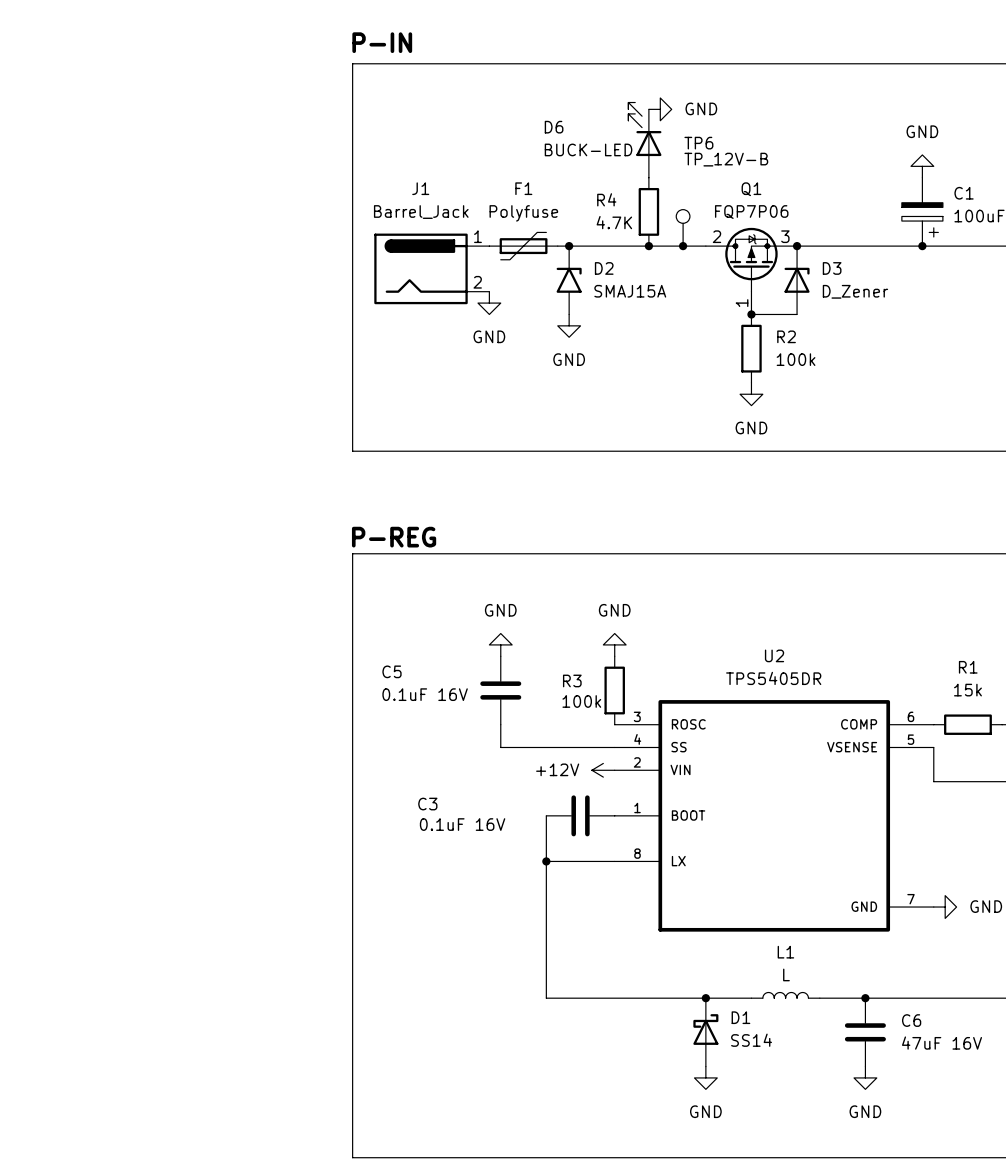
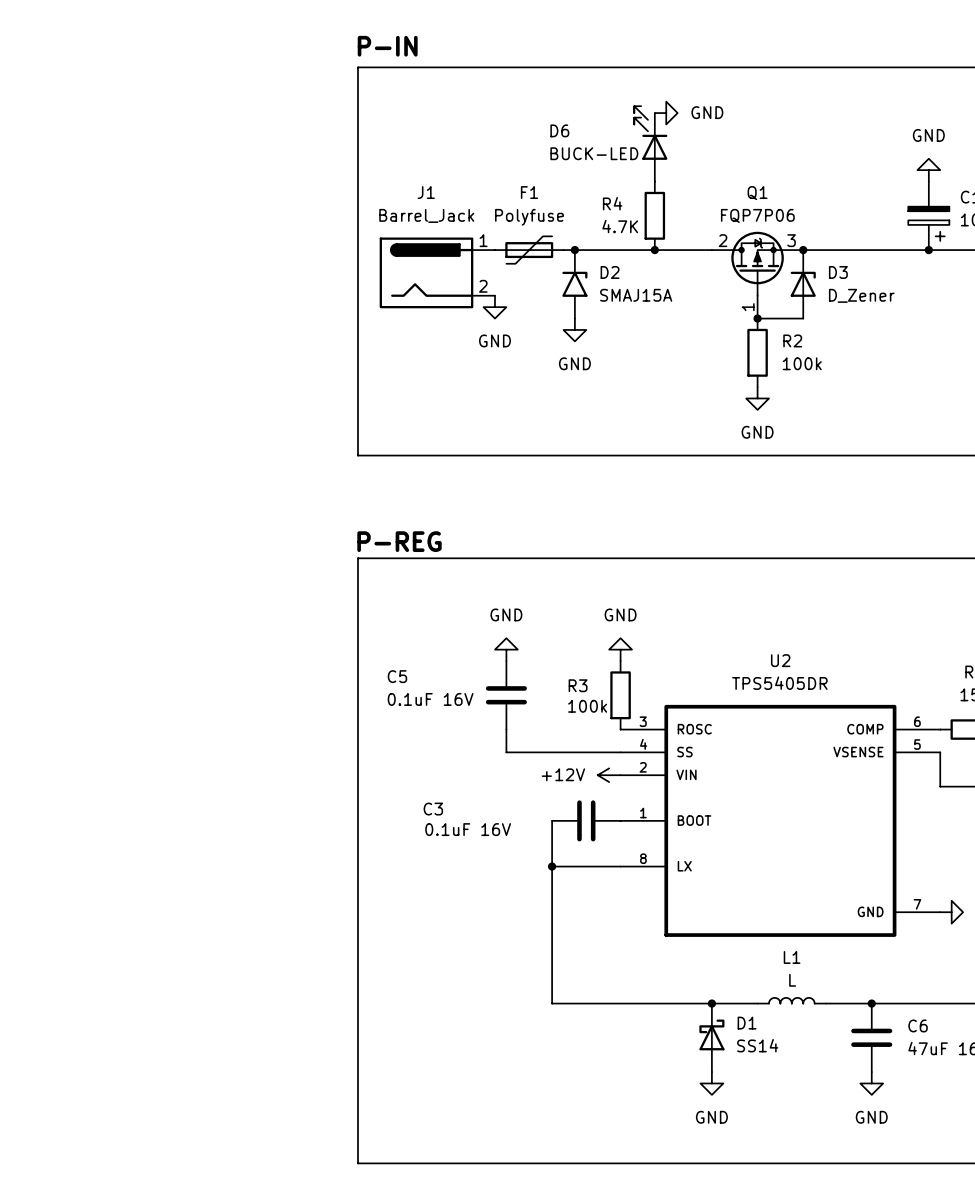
TP6: TP_12V-B (683, 227) -> none
junction: (683, 246) -> none

